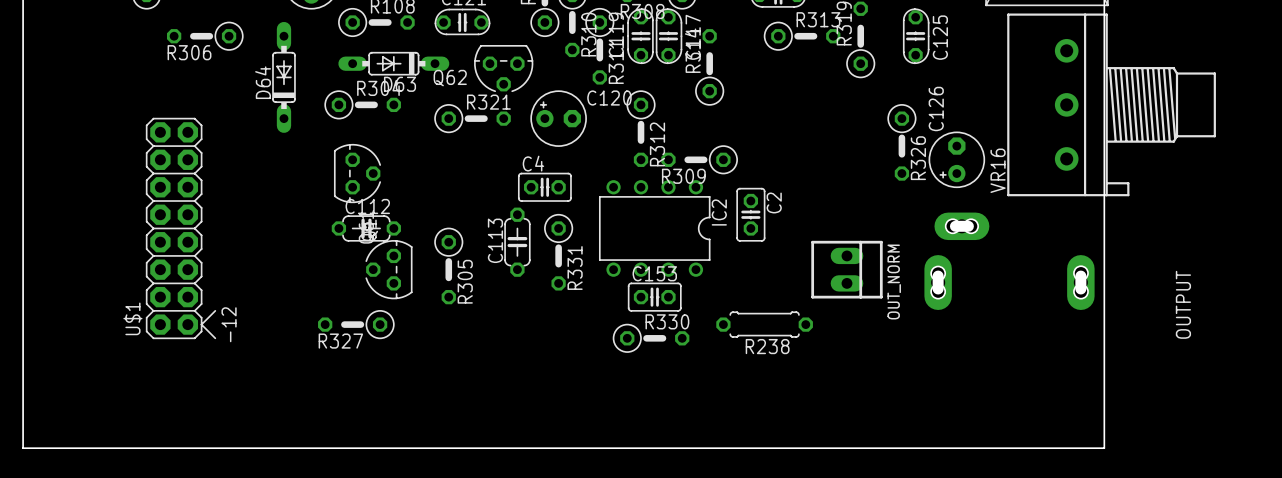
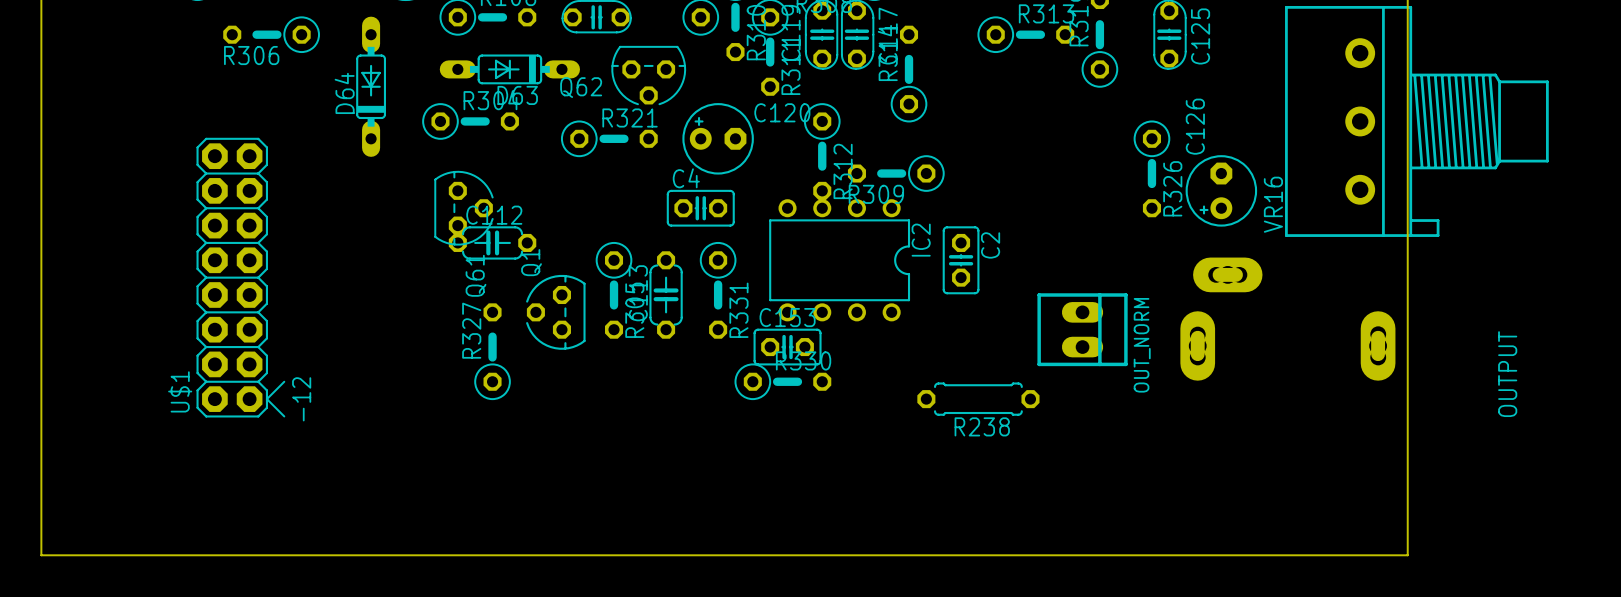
R309 position: (699, 159) -> (896, 173)
C4 position: (544, 187) -> (700, 208)
C112 position: (366, 228) -> (492, 242)
IC2 position: (654, 228) -> (839, 260)
R331 position: (558, 252) -> (718, 290)
R305 position: (448, 266) -> (614, 290)
Q1 position: (388, 269) -> (555, 312)
C153 position: (654, 297) -> (787, 347)
R327 rotation: 0° (356, 324) -> 90° clockwise (492, 351)
R330 position: (651, 338) -> (783, 381)

